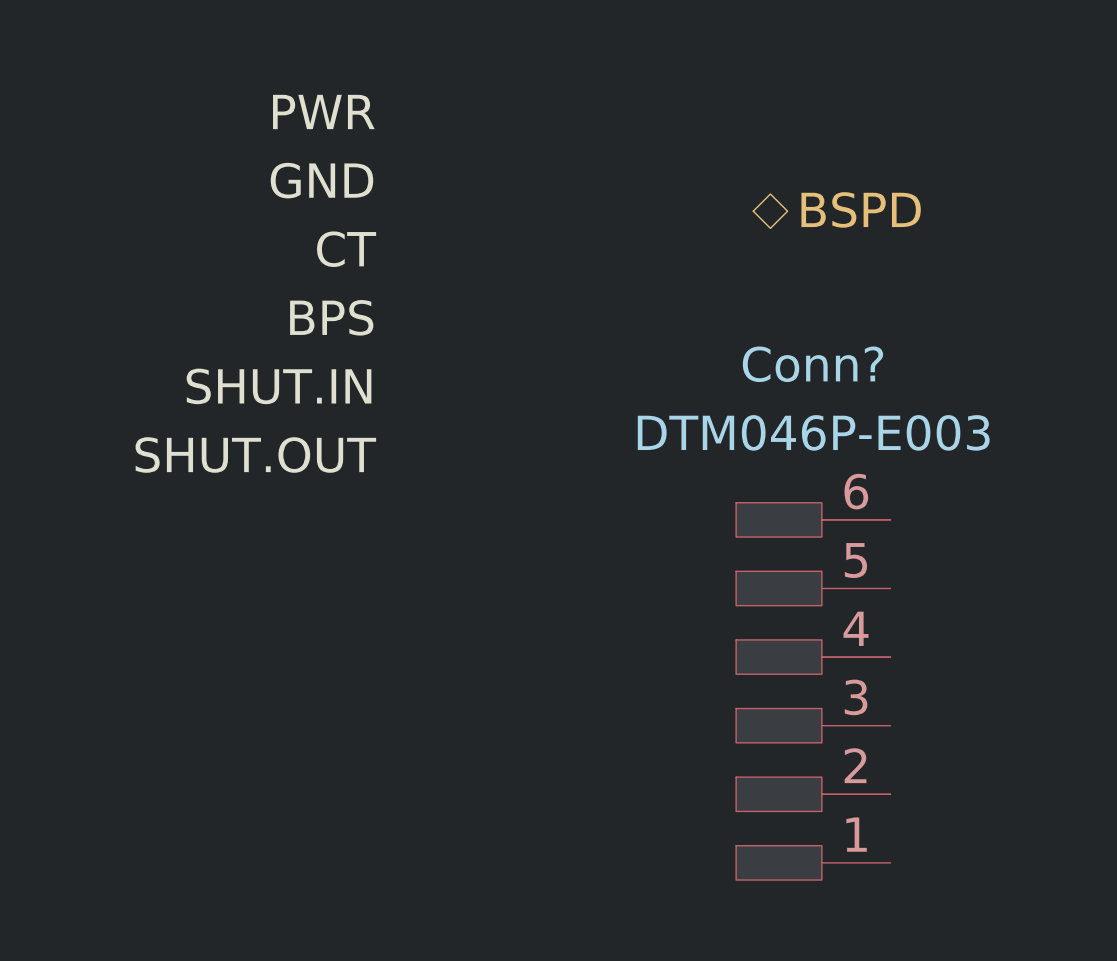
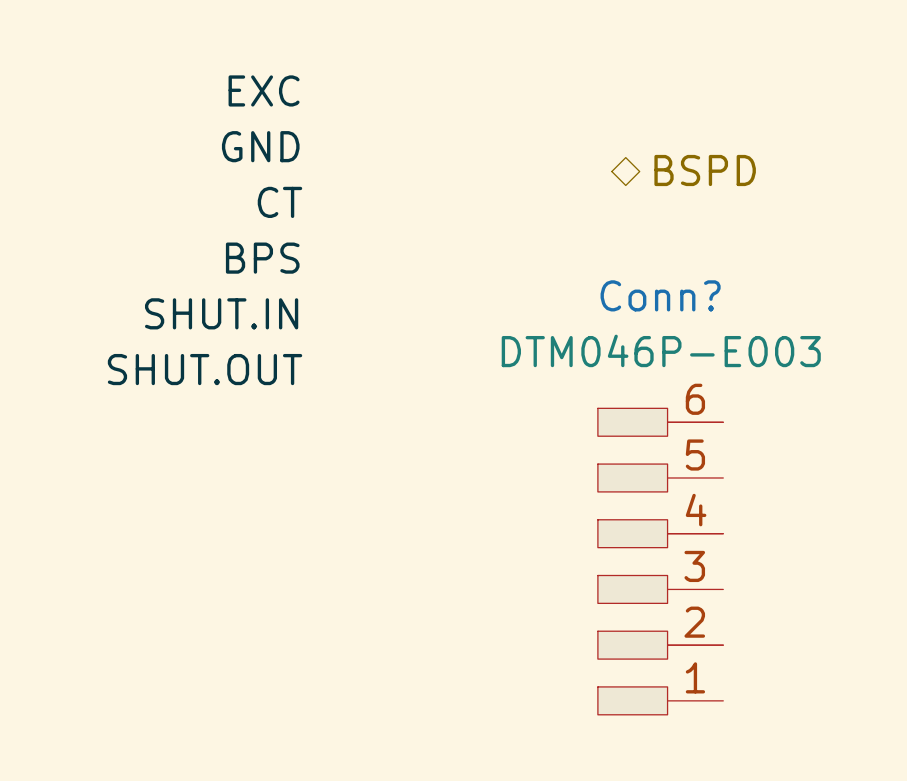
label: PWR (323, 111) -> EXC (264, 90)

